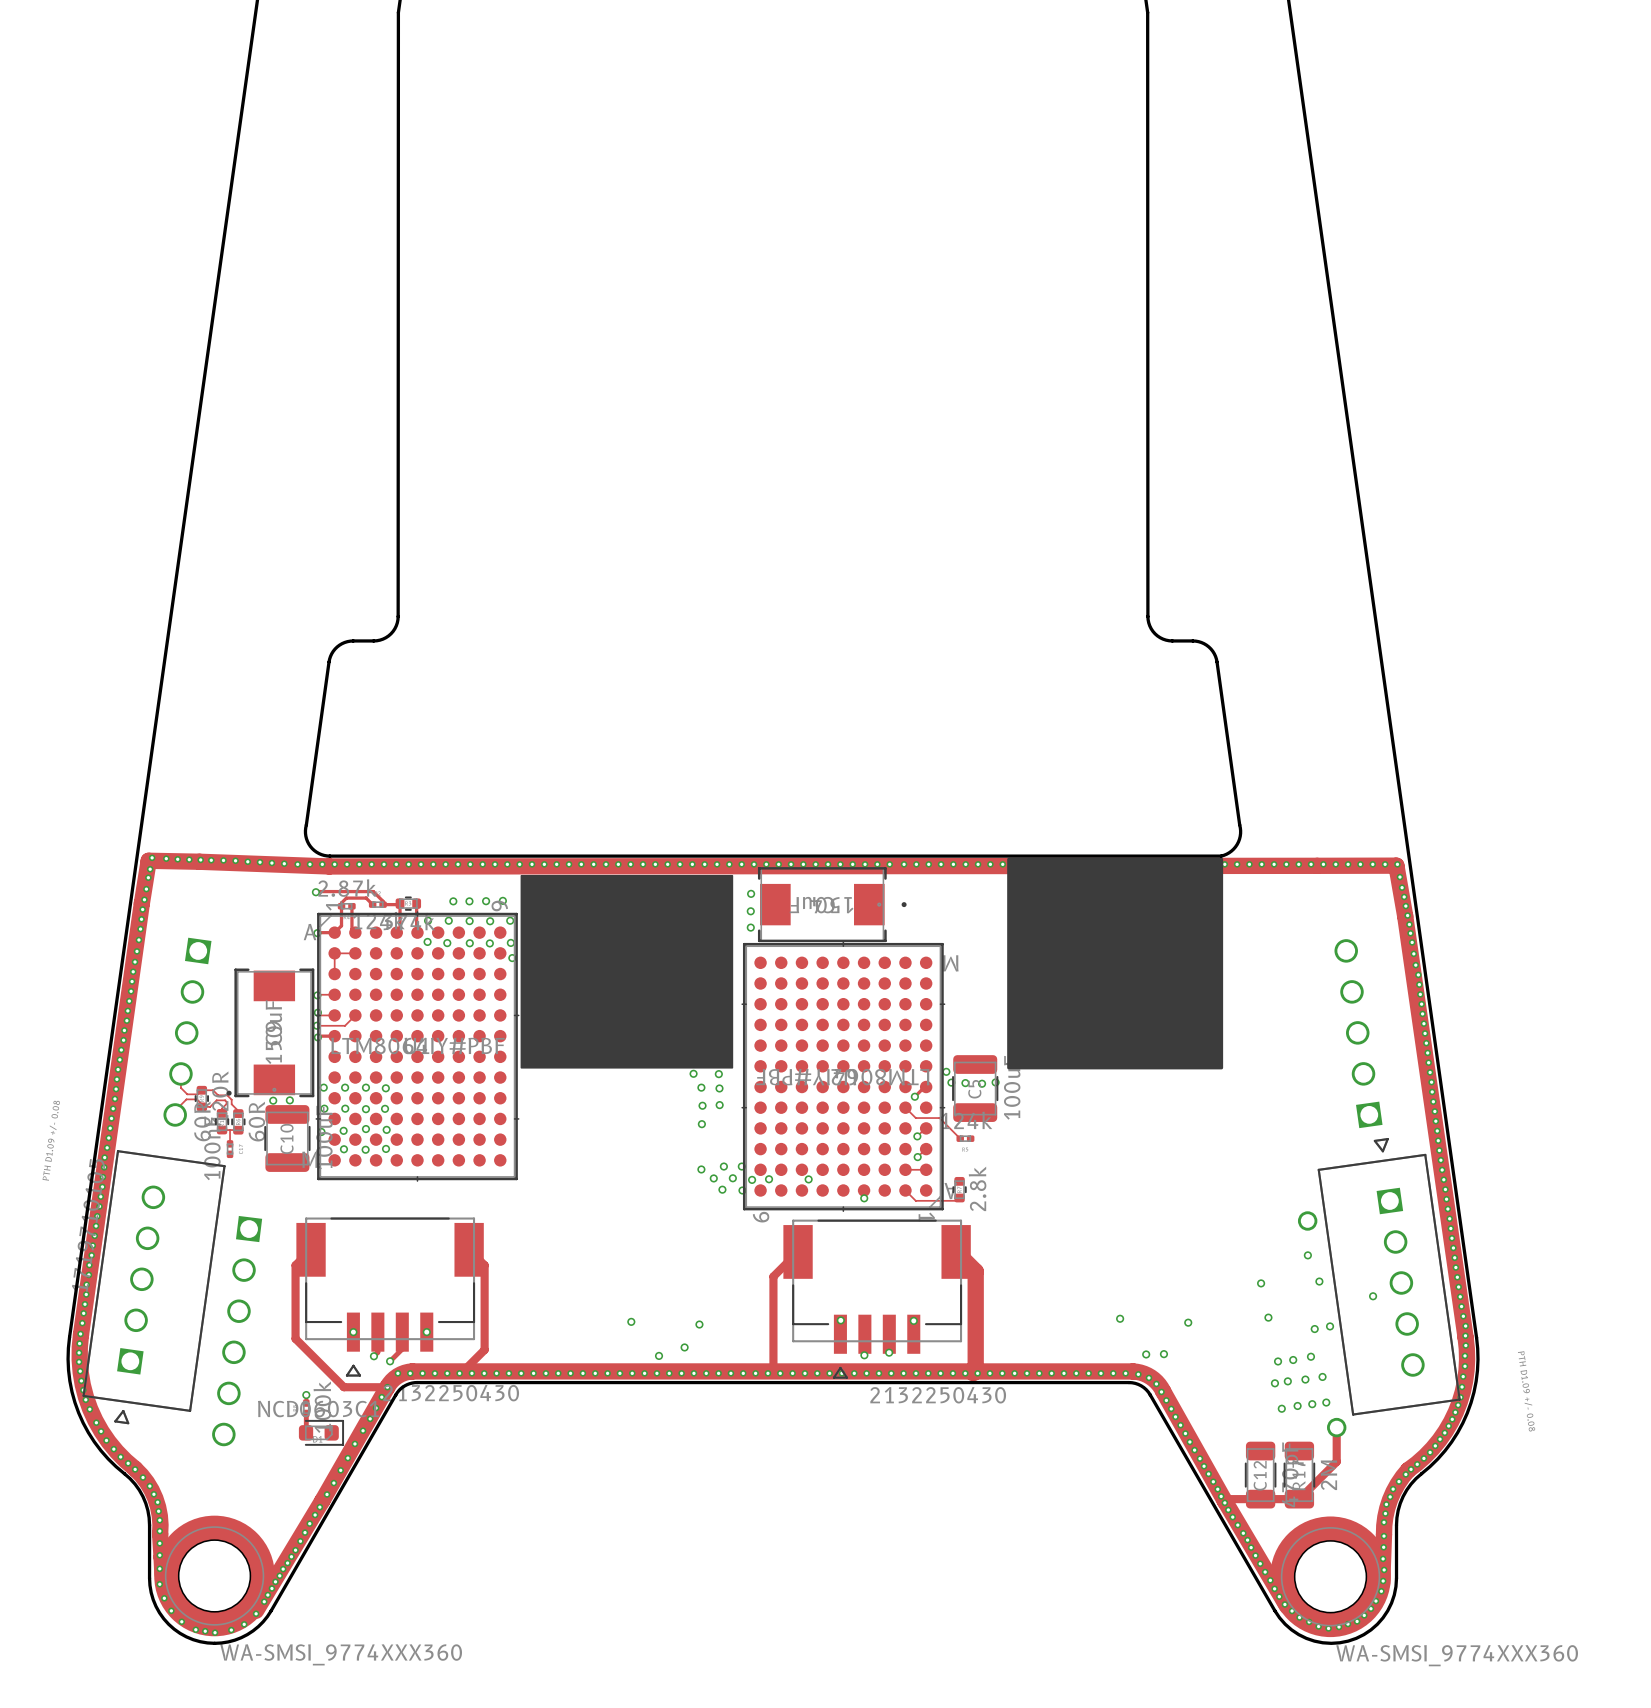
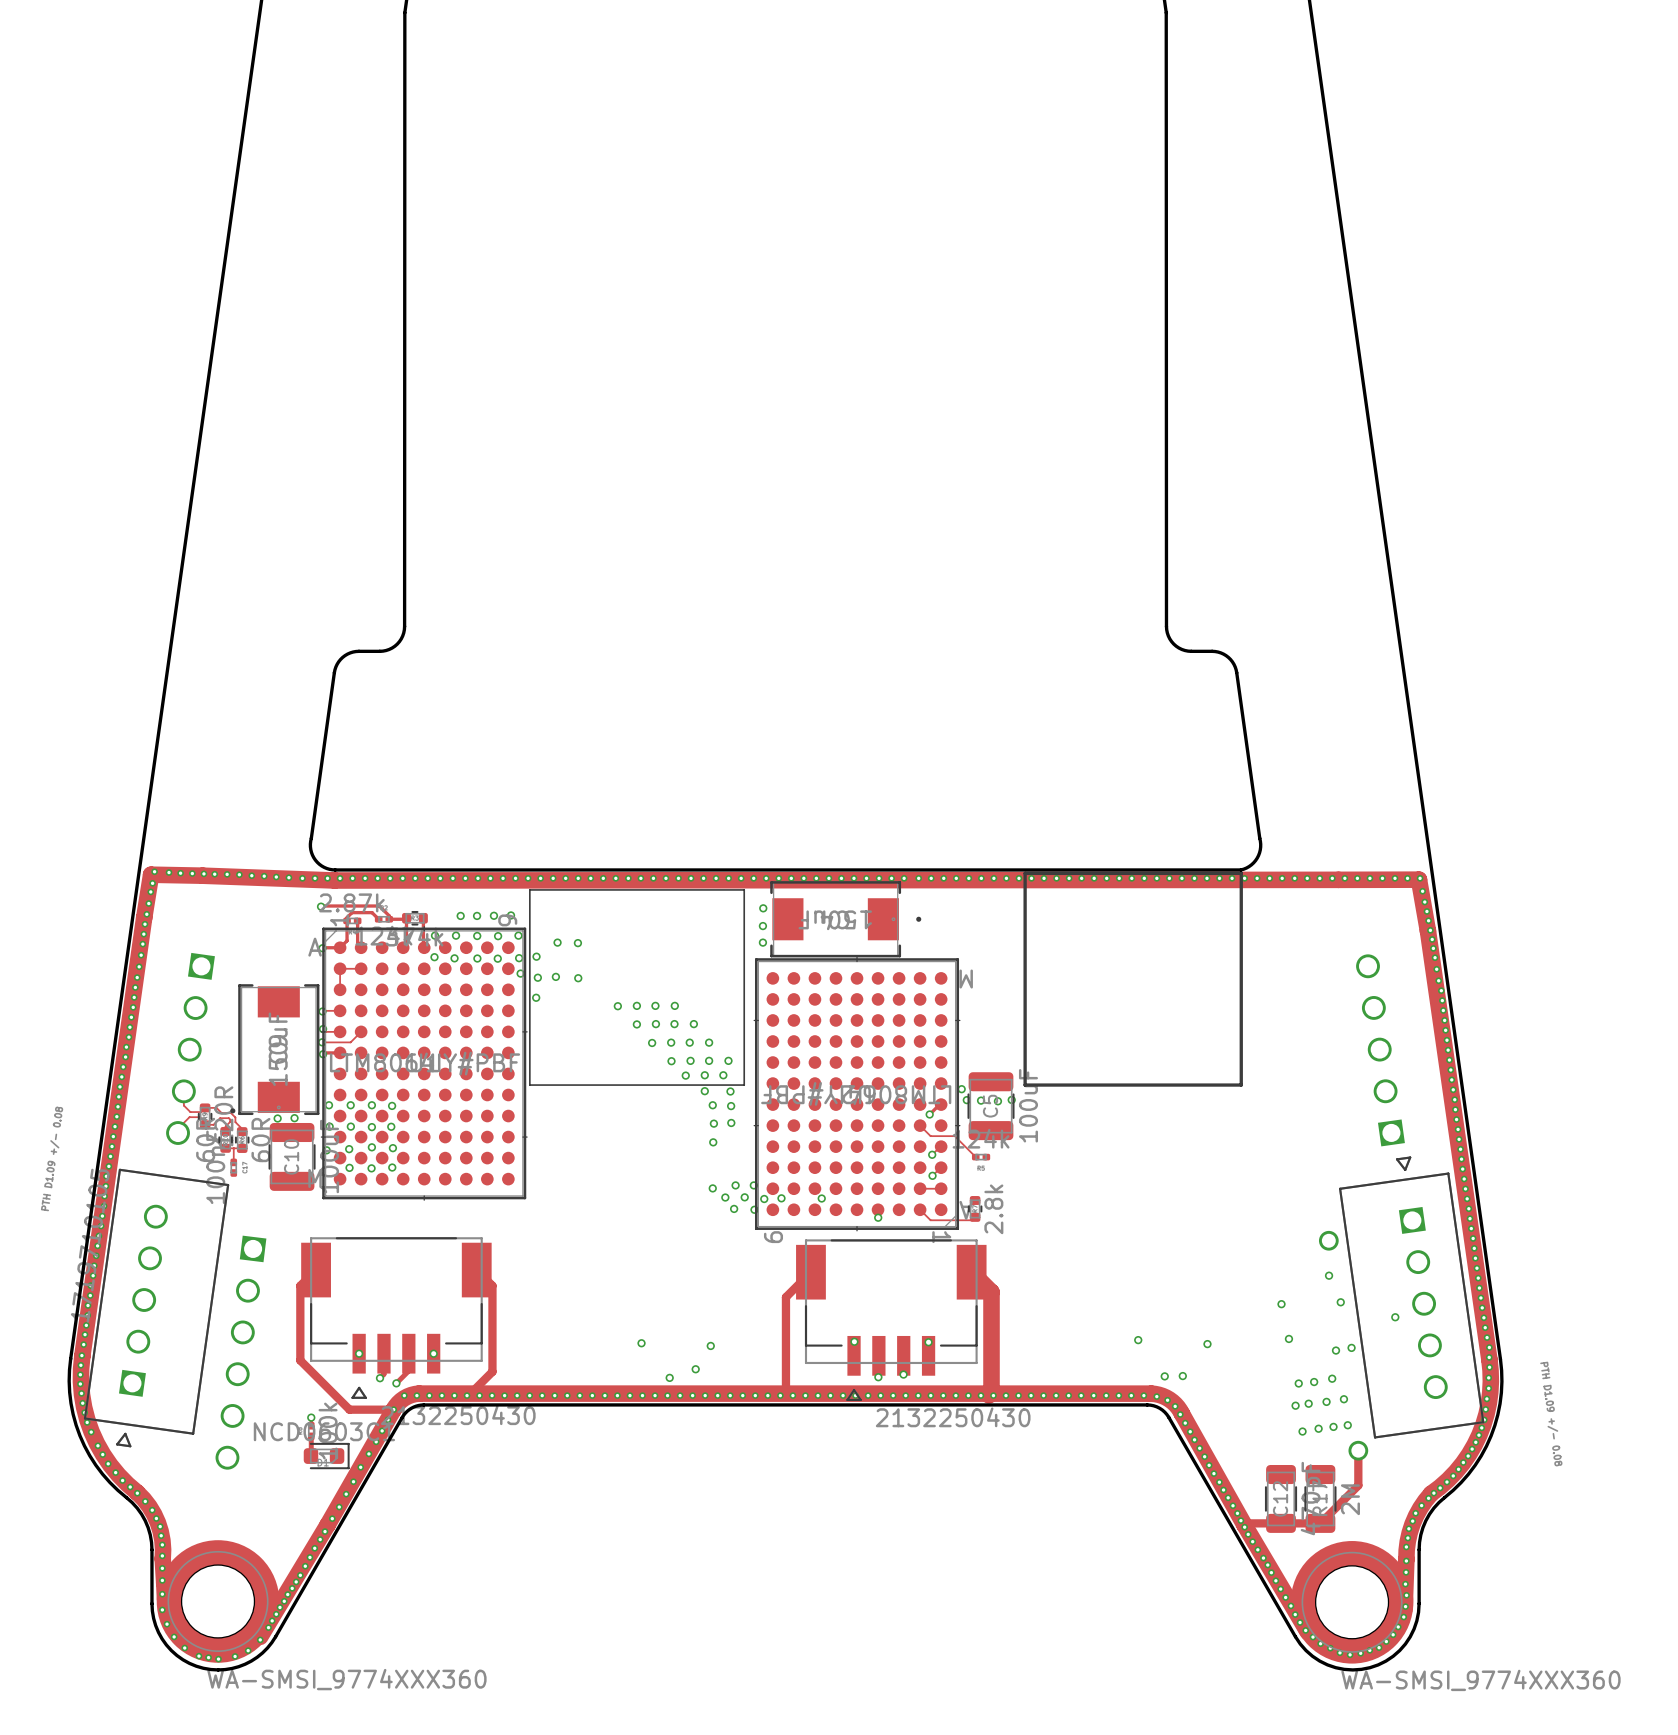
drawing: [1007, 857, 1224, 1070] -> none
line: none -> (1025, 873) (1241, 873) (1241, 1085) (1025, 1085) (1025, 873)
drawing: [520, 874, 734, 1069] -> none
line: none -> (529, 889) (744, 889) (744, 1085) (529, 1085) (529, 889)

